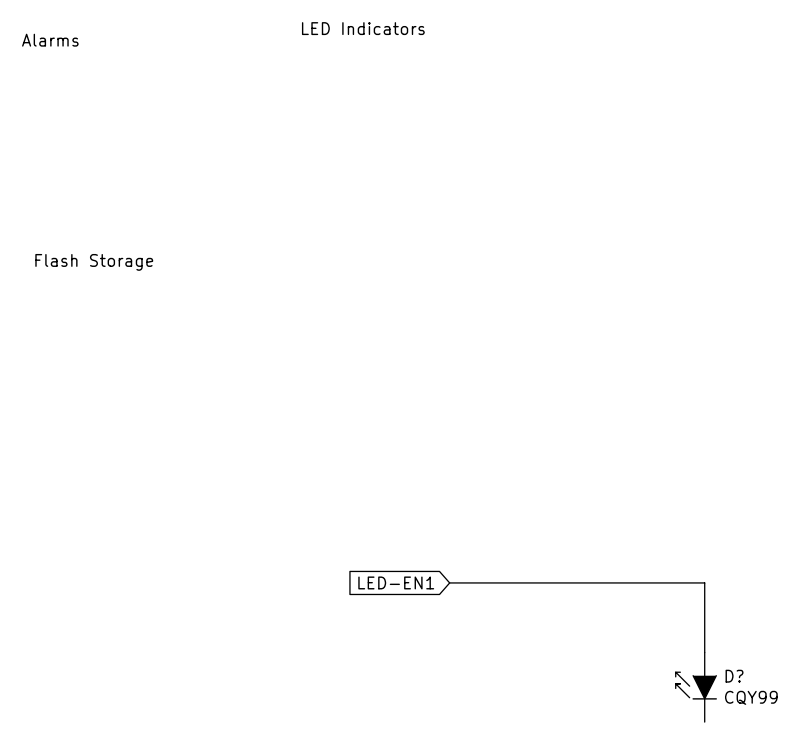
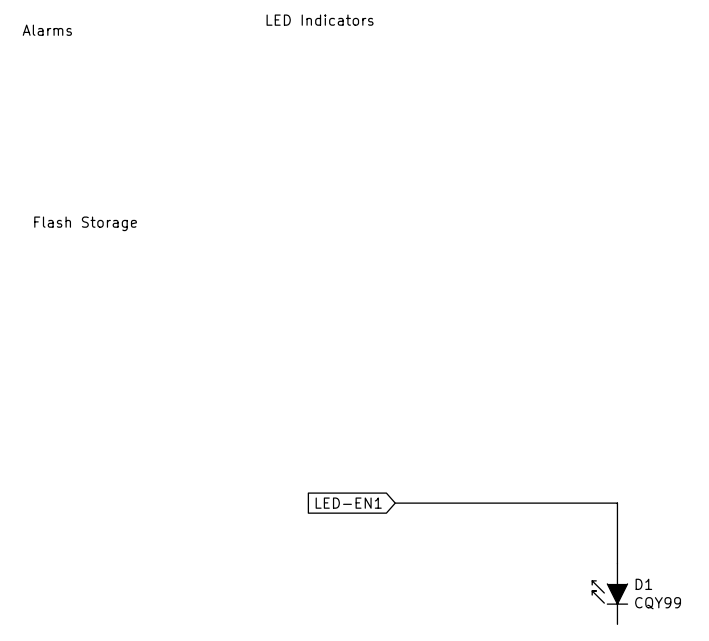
D? name: D? (734, 676) -> D1 (643, 584)

